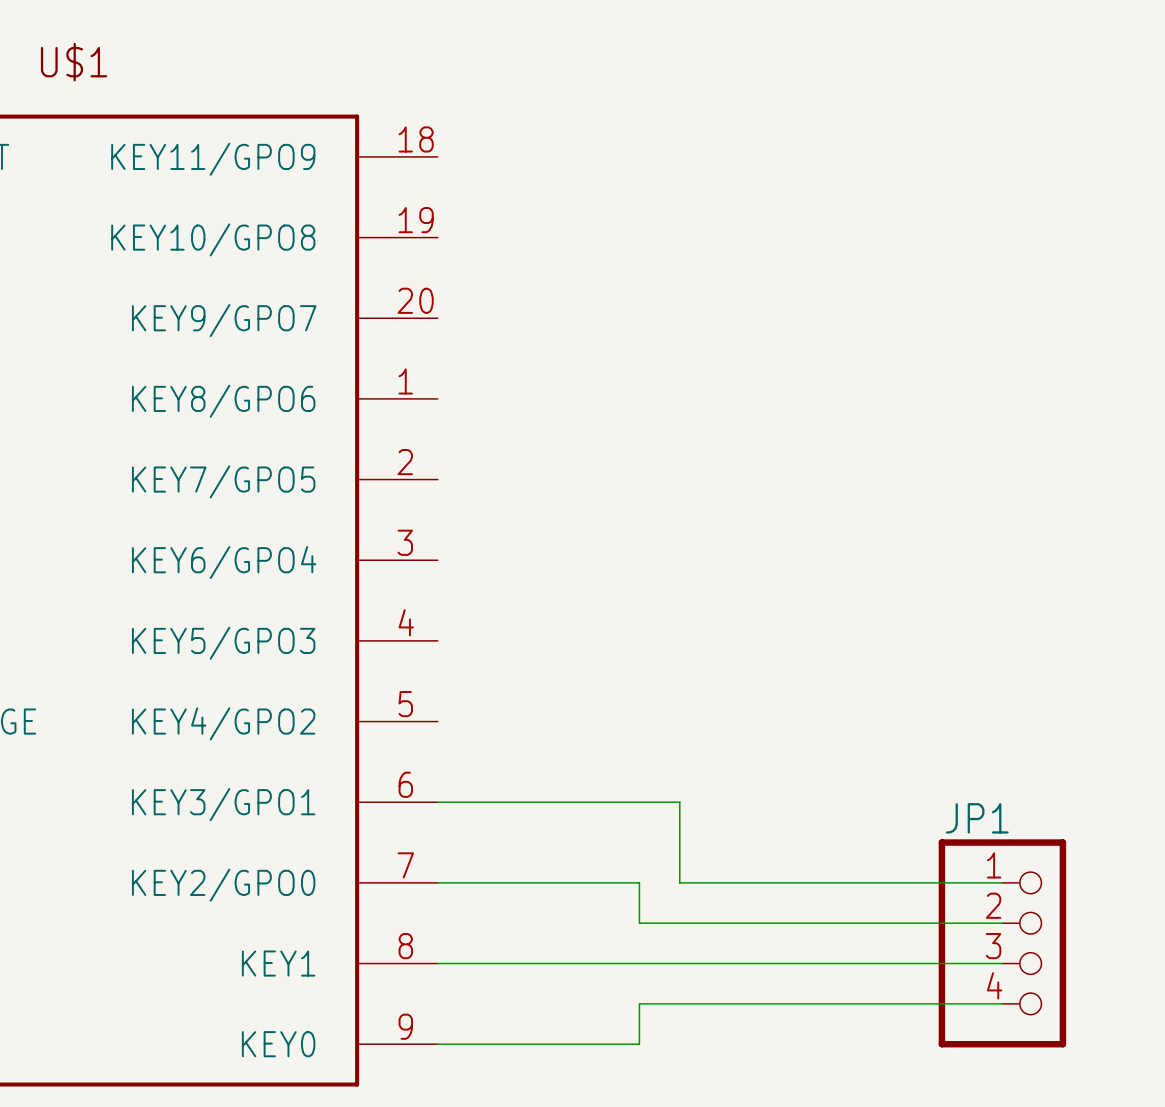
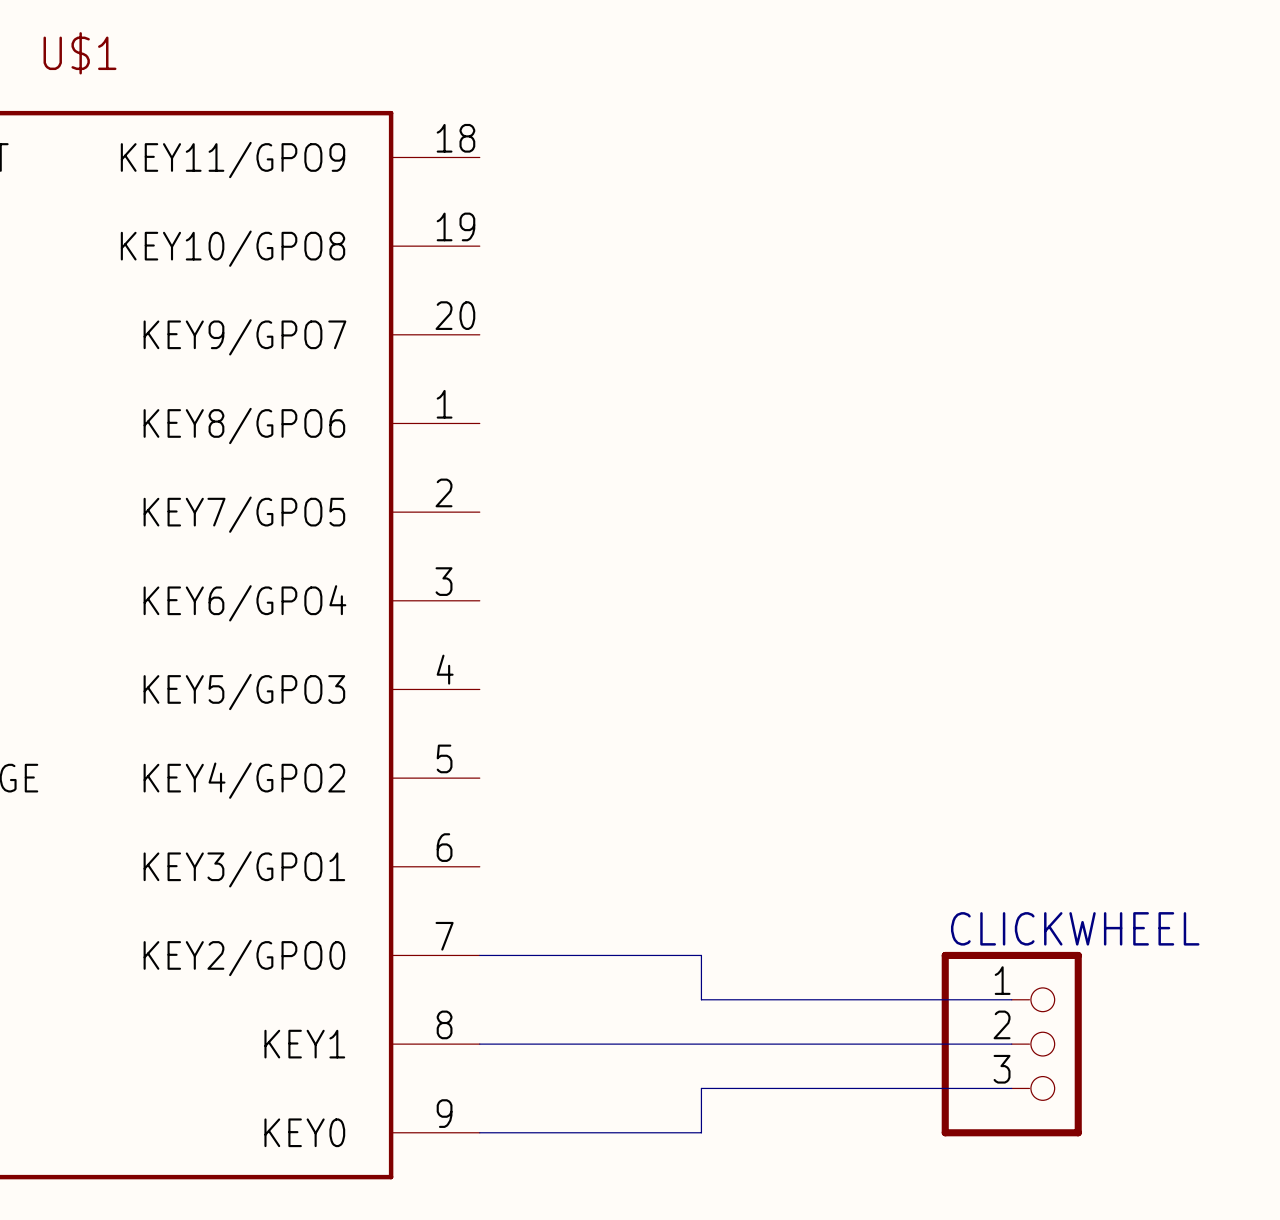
wire: (437, 802) (679, 802) (679, 882) (1002, 882) -> none
wire: (921, 923) (1002, 923) -> none
JP1: (1002, 943) -> none
wire: (921, 963) (1002, 963) -> none
CLICKWHEEL: none -> (1011, 1044)
wire: (921, 1003) (1002, 1003) -> none

